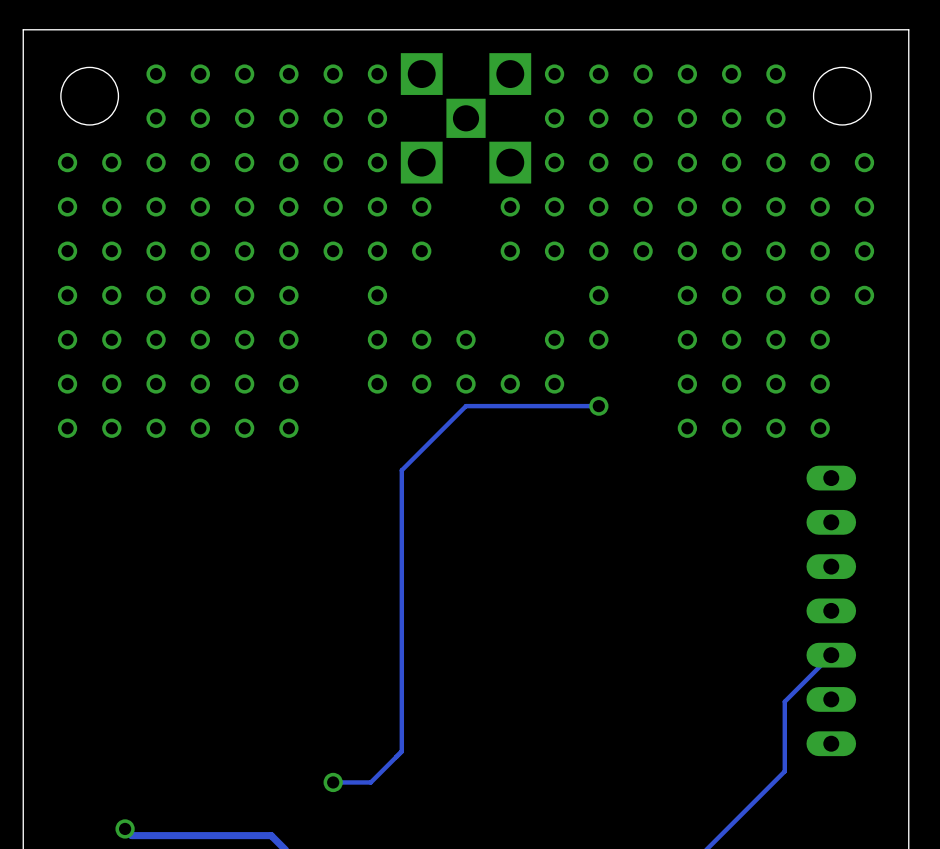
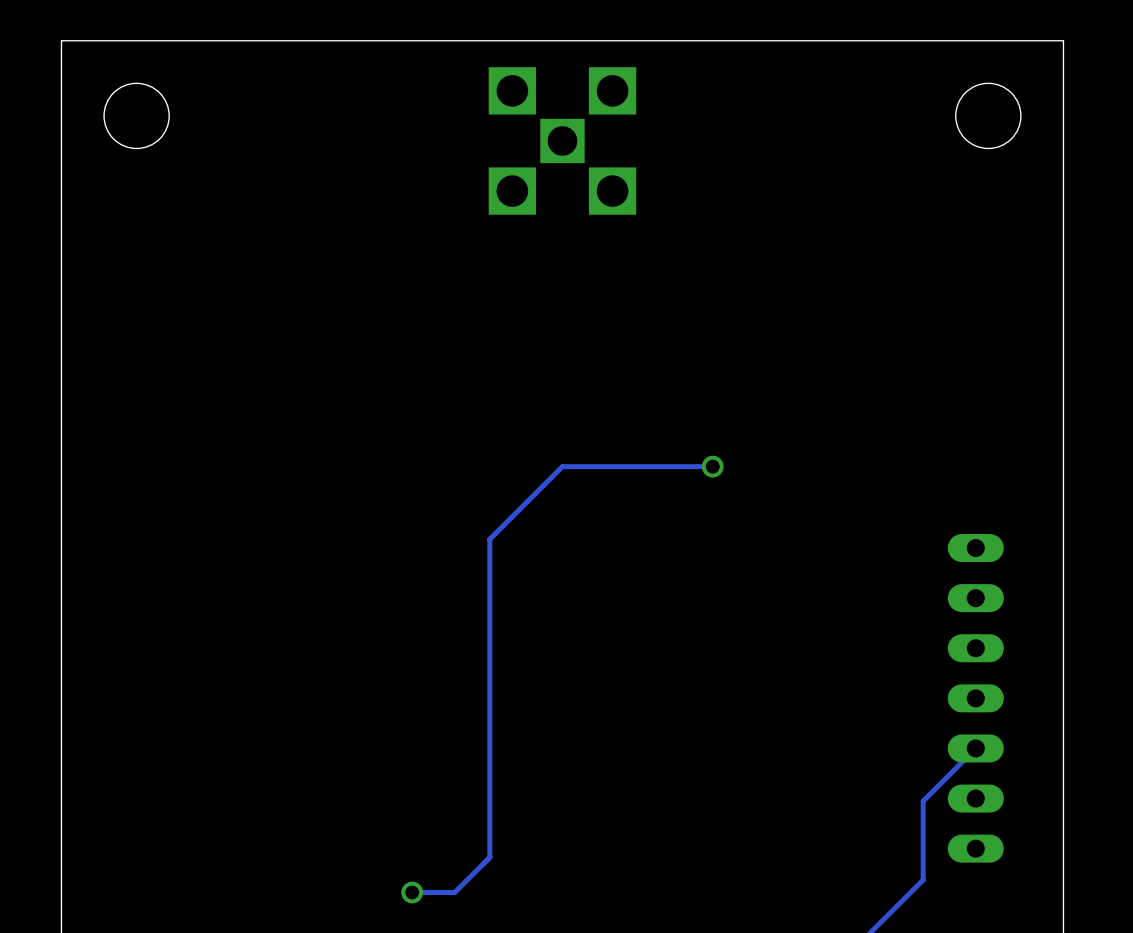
via: (156, 74) -> none
via: (200, 74) -> none
via: (244, 74) -> none
via: (288, 74) -> none
via: (333, 74) -> none
via: (377, 74) -> none
via: (554, 74) -> none
via: (598, 74) -> none
via: (643, 74) -> none
via: (687, 74) -> none
via: (731, 74) -> none
via: (775, 74) -> none
via: (156, 118) -> none
via: (200, 118) -> none
via: (244, 118) -> none
via: (288, 118) -> none
via: (333, 118) -> none
via: (377, 118) -> none
via: (554, 118) -> none
via: (598, 118) -> none
via: (643, 118) -> none
via: (687, 118) -> none
via: (731, 118) -> none
via: (775, 118) -> none
via: (67, 162) -> none
via: (111, 162) -> none
via: (156, 162) -> none
via: (200, 162) -> none
via: (244, 162) -> none
via: (288, 162) -> none
via: (333, 162) -> none
via: (377, 162) -> none
via: (554, 162) -> none
via: (598, 162) -> none
via: (643, 162) -> none
via: (687, 162) -> none
via: (731, 162) -> none
via: (775, 162) -> none
via: (820, 162) -> none
via: (864, 162) -> none
via: (67, 206) -> none
via: (111, 206) -> none
via: (156, 206) -> none
via: (200, 206) -> none
via: (244, 206) -> none
via: (288, 206) -> none
via: (333, 206) -> none
via: (377, 206) -> none
via: (421, 206) -> none
via: (510, 206) -> none
via: (554, 206) -> none
via: (598, 206) -> none
via: (643, 206) -> none
via: (687, 206) -> none
via: (731, 206) -> none
via: (775, 206) -> none
via: (820, 206) -> none
via: (864, 206) -> none
via: (67, 251) -> none
via: (111, 251) -> none
via: (156, 251) -> none
via: (200, 251) -> none
via: (244, 251) -> none
via: (288, 251) -> none
via: (333, 251) -> none
via: (377, 251) -> none
via: (421, 251) -> none
via: (510, 251) -> none
via: (554, 251) -> none
via: (598, 251) -> none
via: (643, 251) -> none
via: (687, 251) -> none
via: (731, 251) -> none
via: (775, 251) -> none
via: (820, 251) -> none
via: (864, 251) -> none
via: (67, 295) -> none
via: (111, 295) -> none
via: (156, 295) -> none
via: (200, 295) -> none
via: (244, 295) -> none
via: (288, 295) -> none
via: (377, 295) -> none
via: (598, 295) -> none
via: (687, 295) -> none
via: (731, 295) -> none
via: (775, 295) -> none
via: (820, 295) -> none
via: (864, 295) -> none
via: (67, 339) -> none
via: (111, 339) -> none
via: (156, 339) -> none
via: (200, 339) -> none
via: (244, 339) -> none
via: (288, 339) -> none
via: (377, 339) -> none
via: (421, 339) -> none
via: (466, 339) -> none
via: (554, 339) -> none
via: (598, 339) -> none
via: (687, 339) -> none
via: (731, 339) -> none
via: (775, 339) -> none
via: (820, 339) -> none
via: (67, 383) -> none
via: (111, 383) -> none
via: (156, 383) -> none
via: (200, 383) -> none
via: (244, 383) -> none
via: (288, 383) -> none
via: (377, 383) -> none
via: (421, 383) -> none
via: (466, 383) -> none
via: (510, 383) -> none
via: (554, 383) -> none
via: (687, 383) -> none
via: (731, 383) -> none
via: (775, 383) -> none
via: (820, 383) -> none
via: (67, 428) -> none
via: (111, 428) -> none
via: (156, 428) -> none
via: (200, 428) -> none
via: (244, 428) -> none
via: (288, 428) -> none
via: (687, 428) -> none
via: (731, 428) -> none
via: (775, 428) -> none
via: (820, 428) -> none

